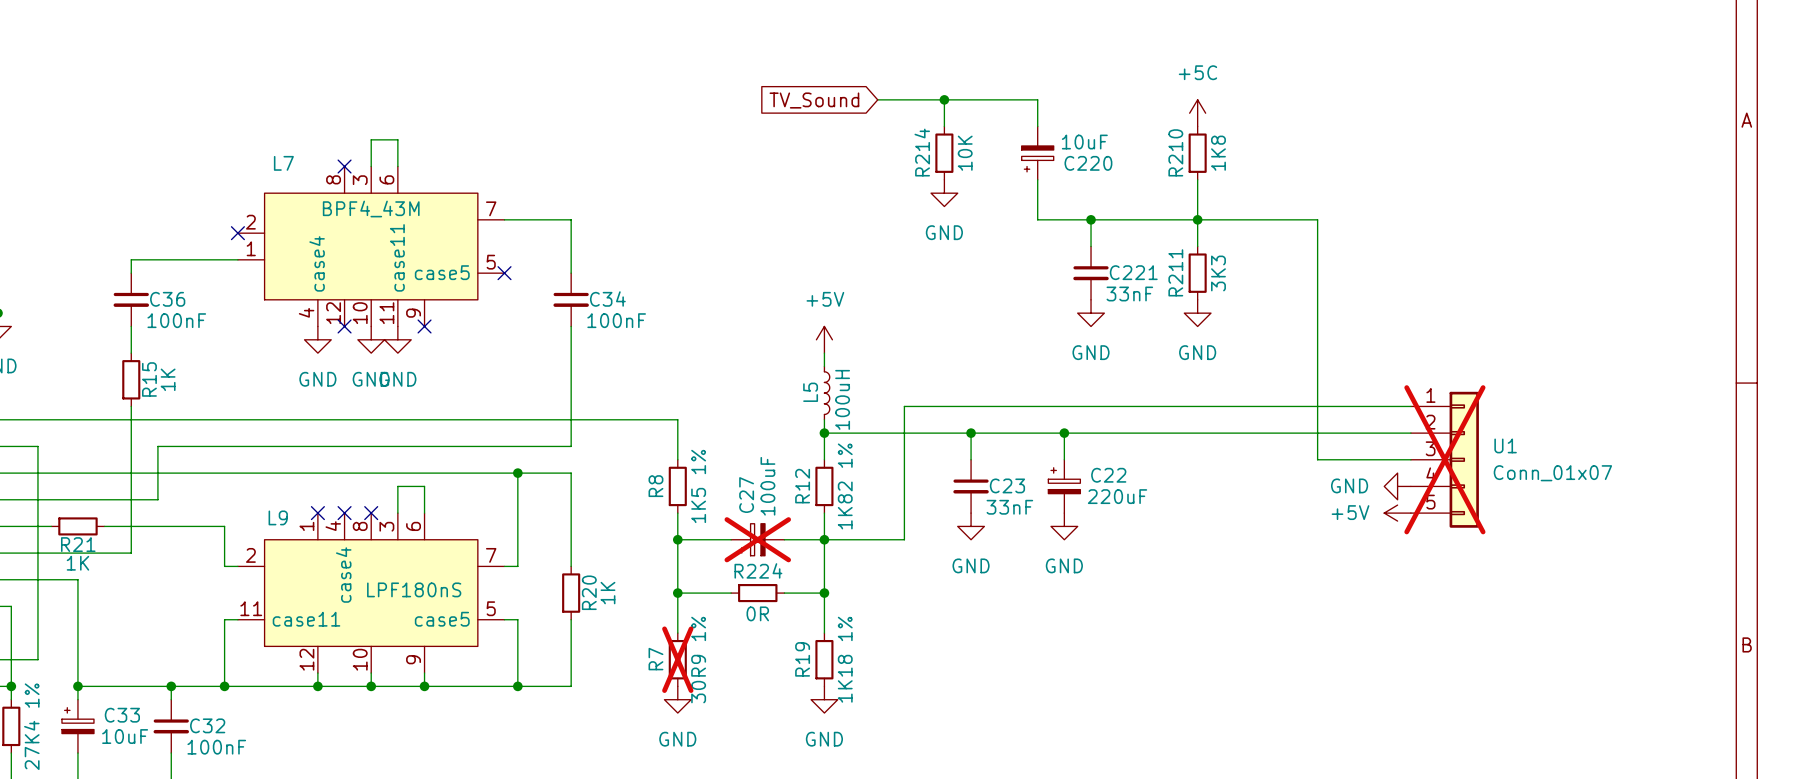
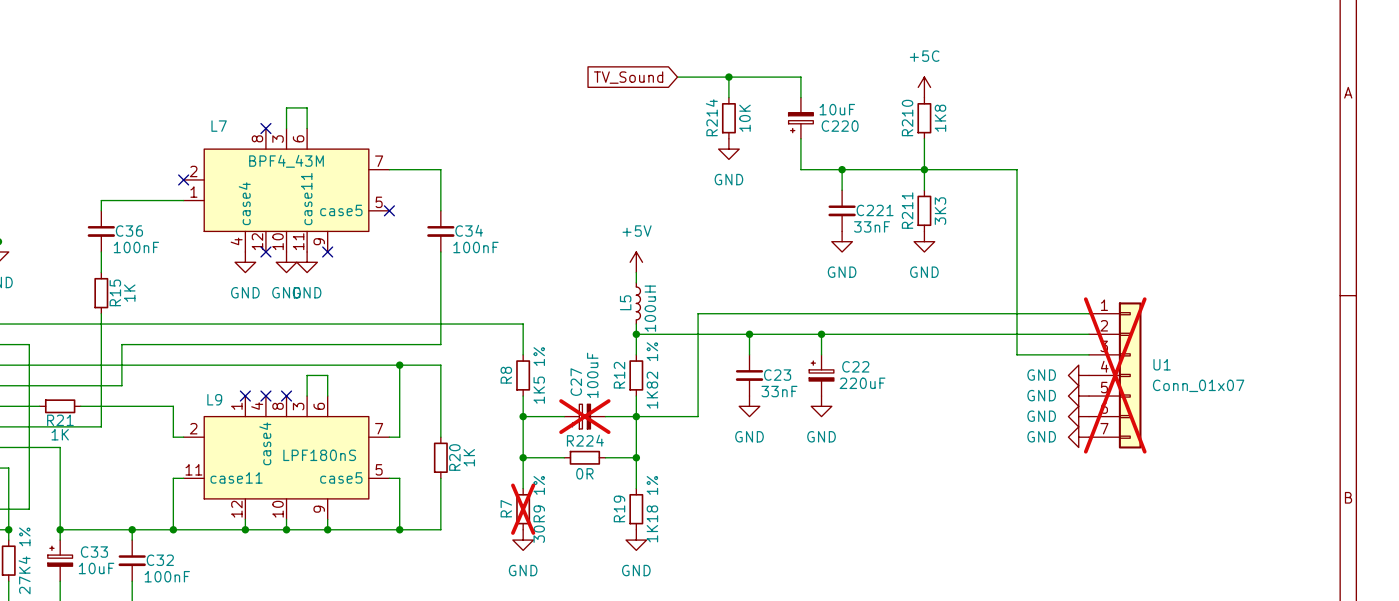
U1 symbol: [1410, 391, 1479, 528] -> [1089, 302, 1142, 449]
power symbol: +5V (1397, 513) -> GND (1078, 396)
power symbol: none -> GND (1078, 416)
power symbol: none -> GND (1078, 437)

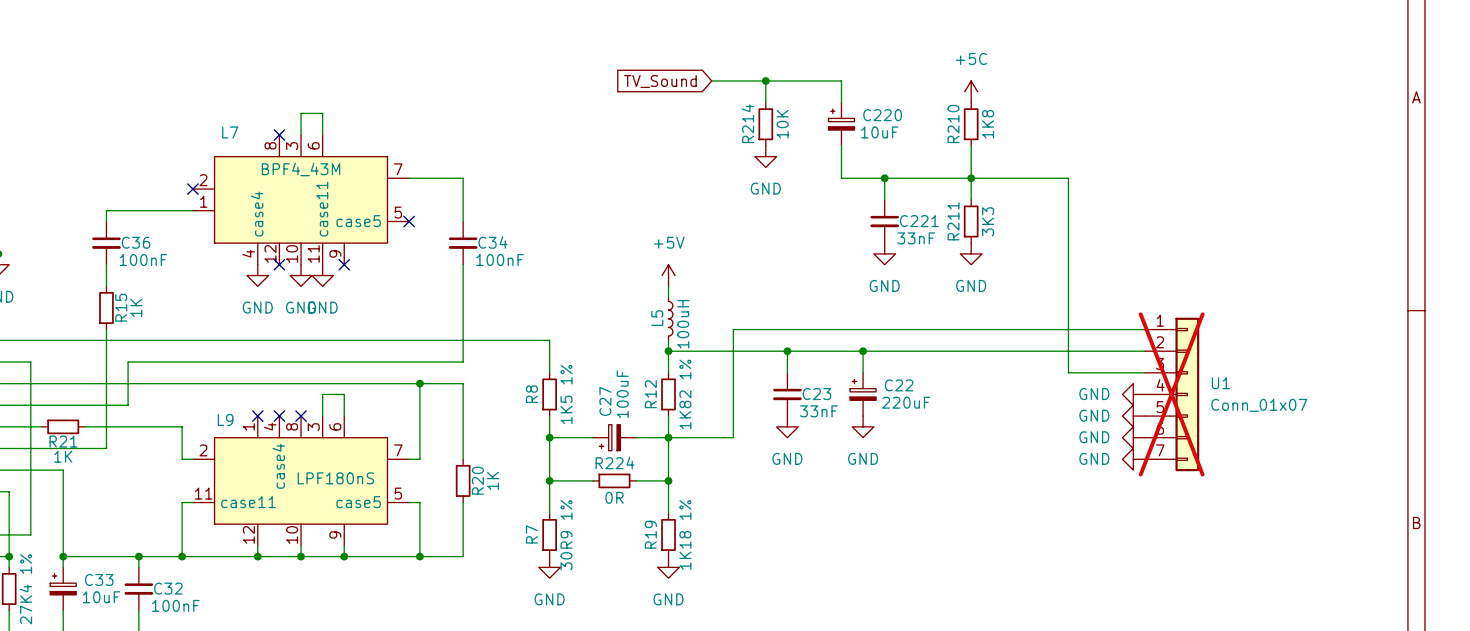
C220 flip: as is (800, 122) -> up-down (841, 119)
C27 do-not-place cross: (584, 416) -> none
R7 do-not-place cross: (523, 509) -> none

